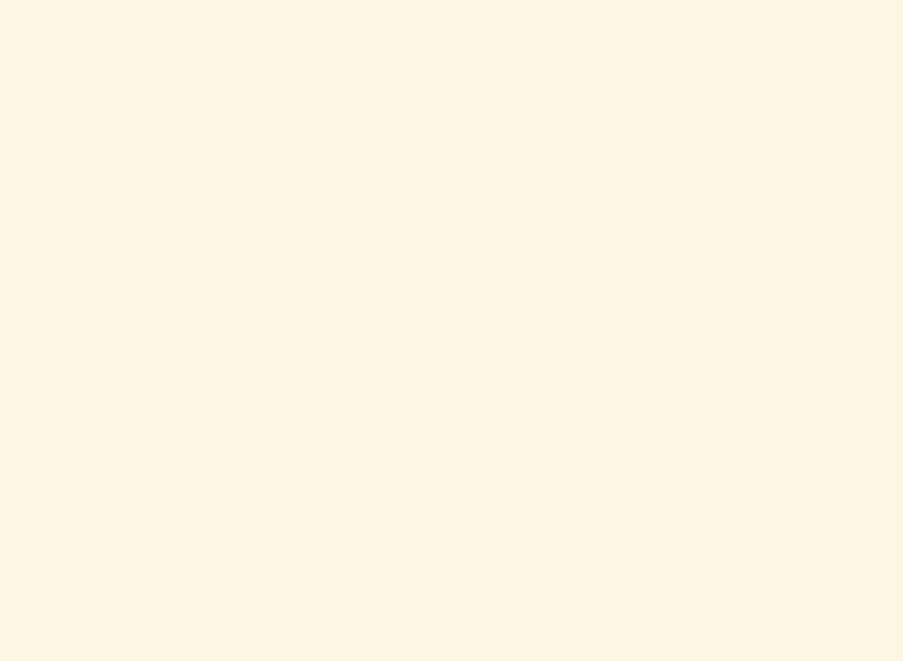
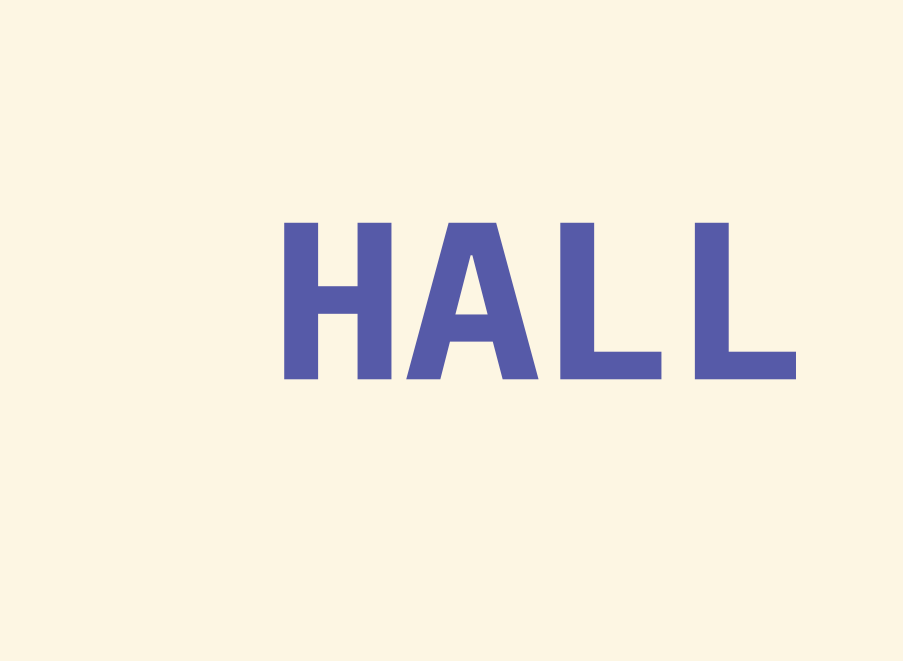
text: none -> HALL (540, 301)

